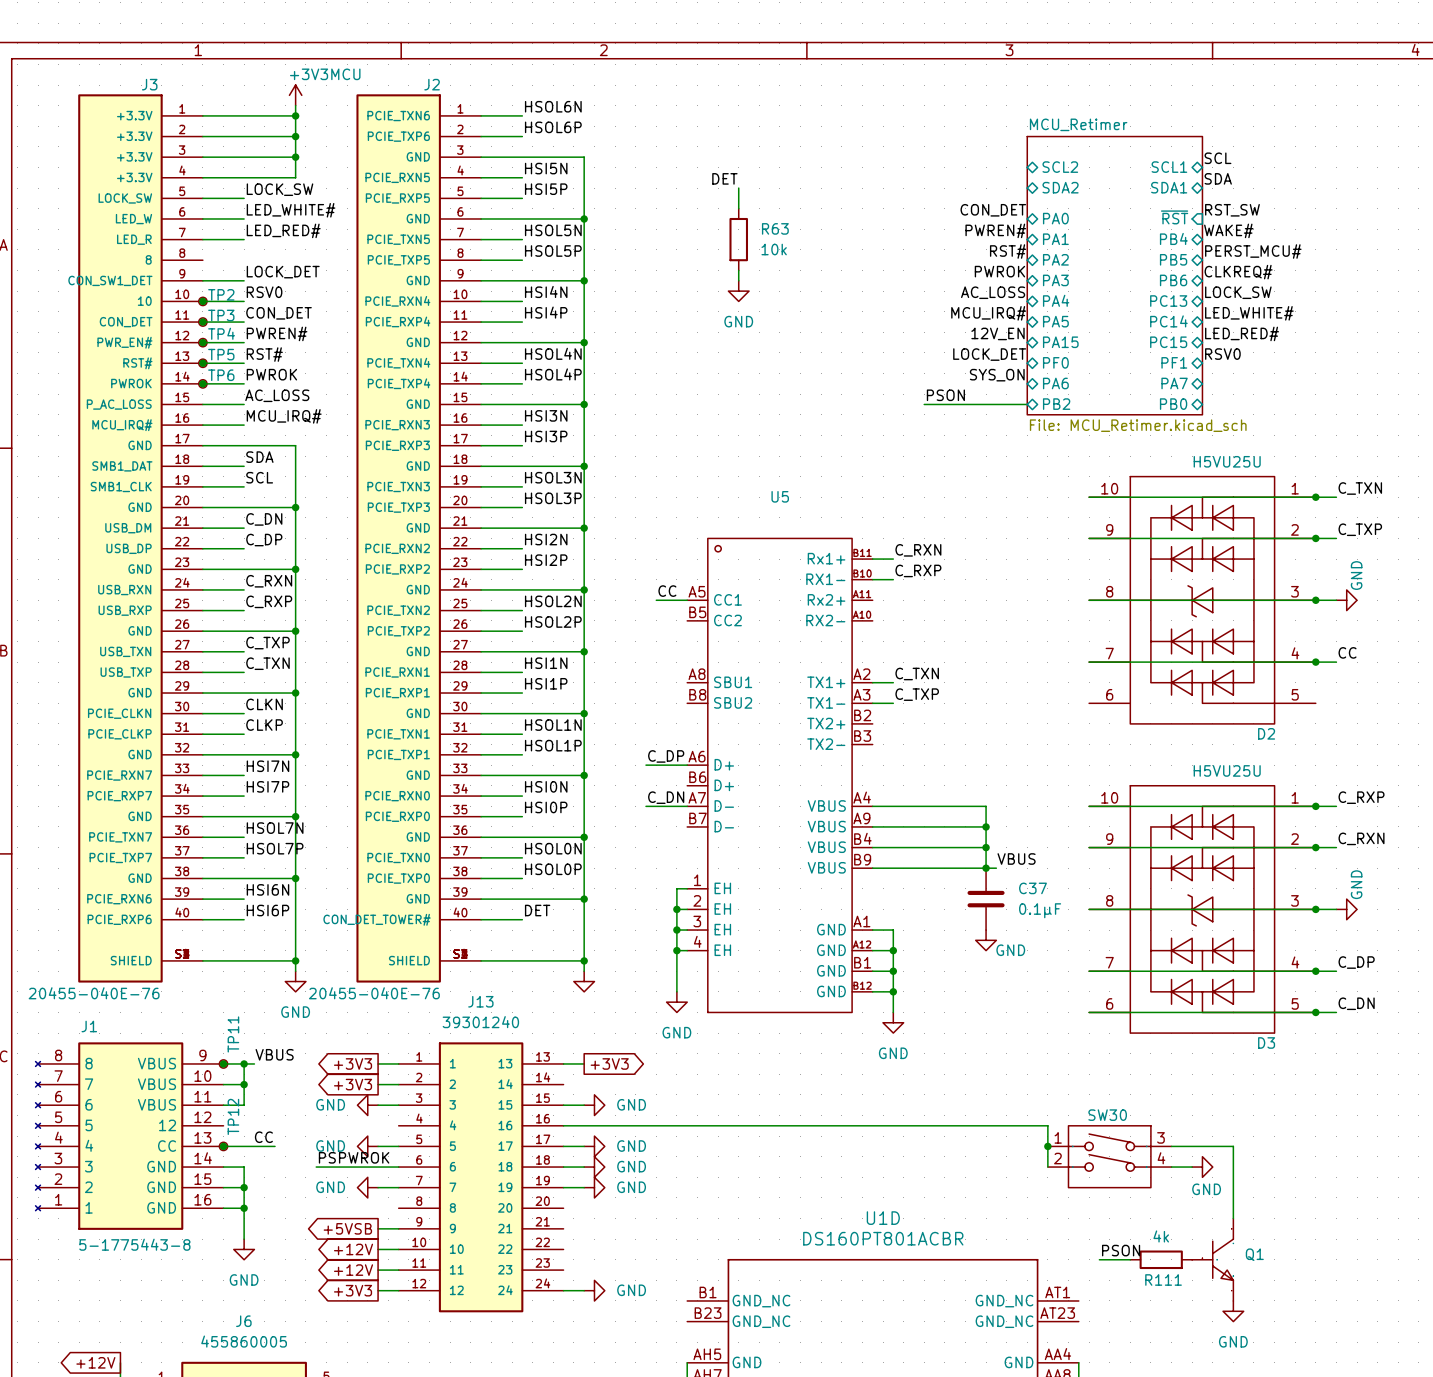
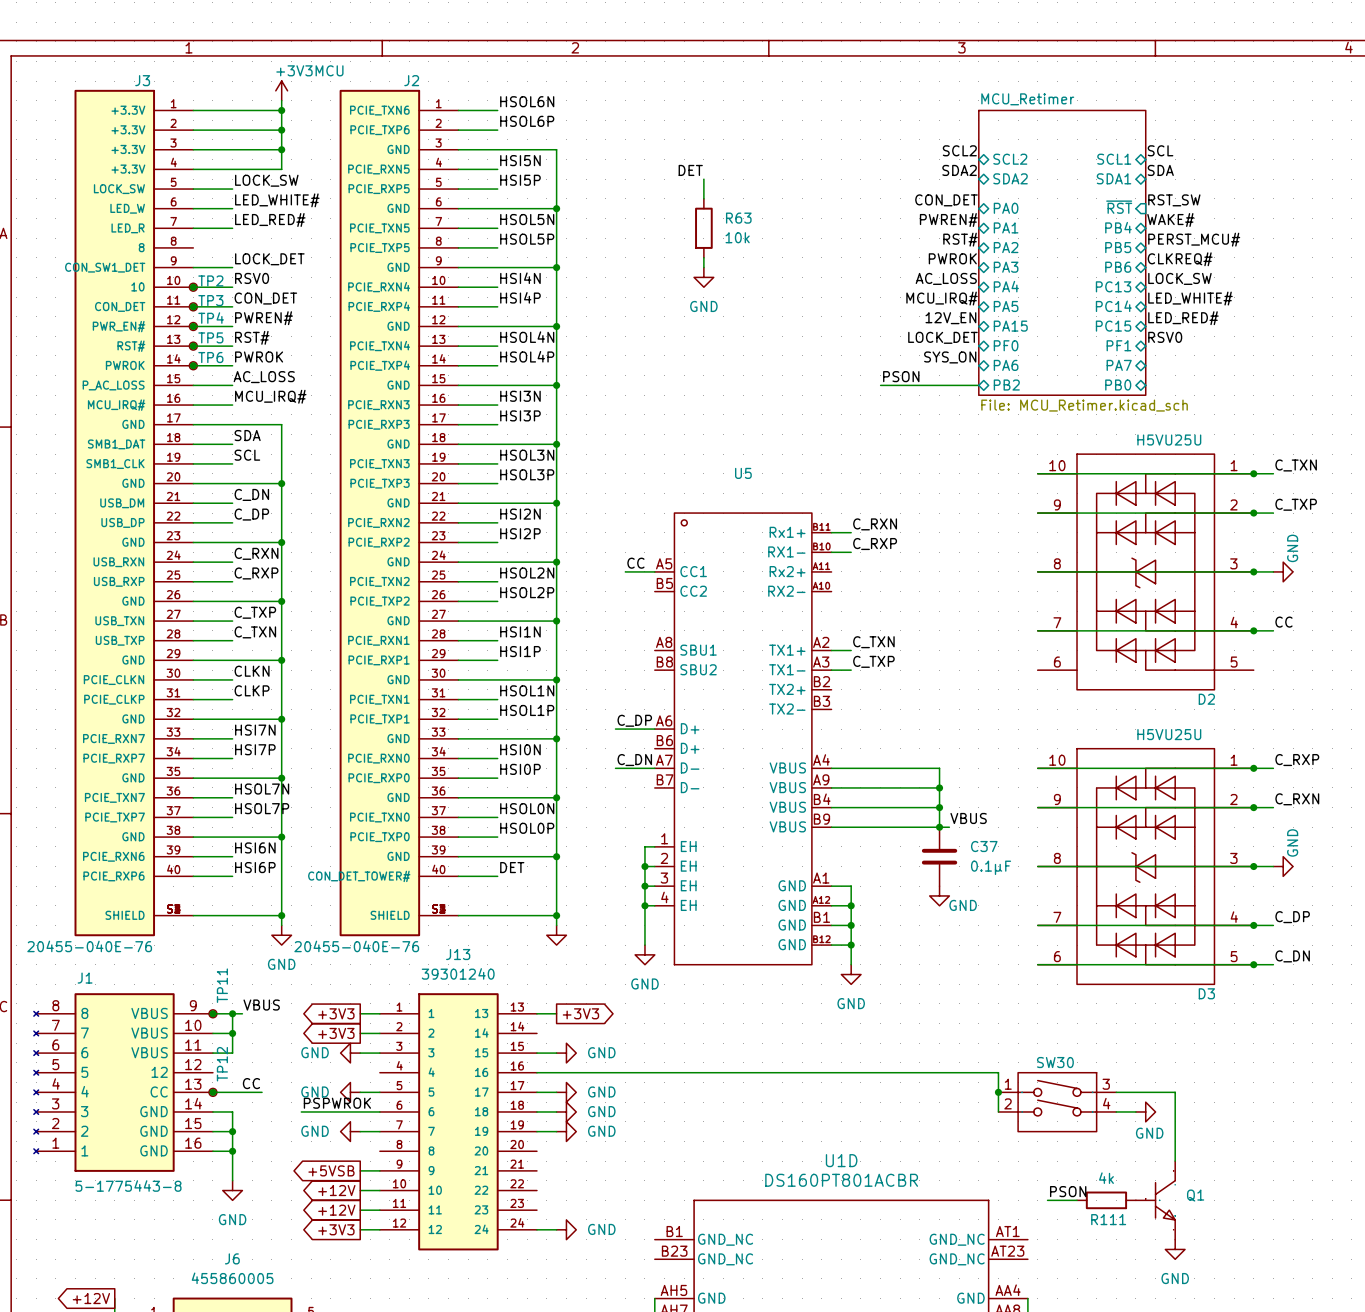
label: none -> SCL2 (959, 150)
label: none -> SDA2 (959, 170)
sheet MCU_Retimer: none -> File: MCU_Retimer.kicad_sch (1062, 252)
sheet MCU_Retimer: File: MCU_Retimer.kicad_sch (1114, 275) -> none

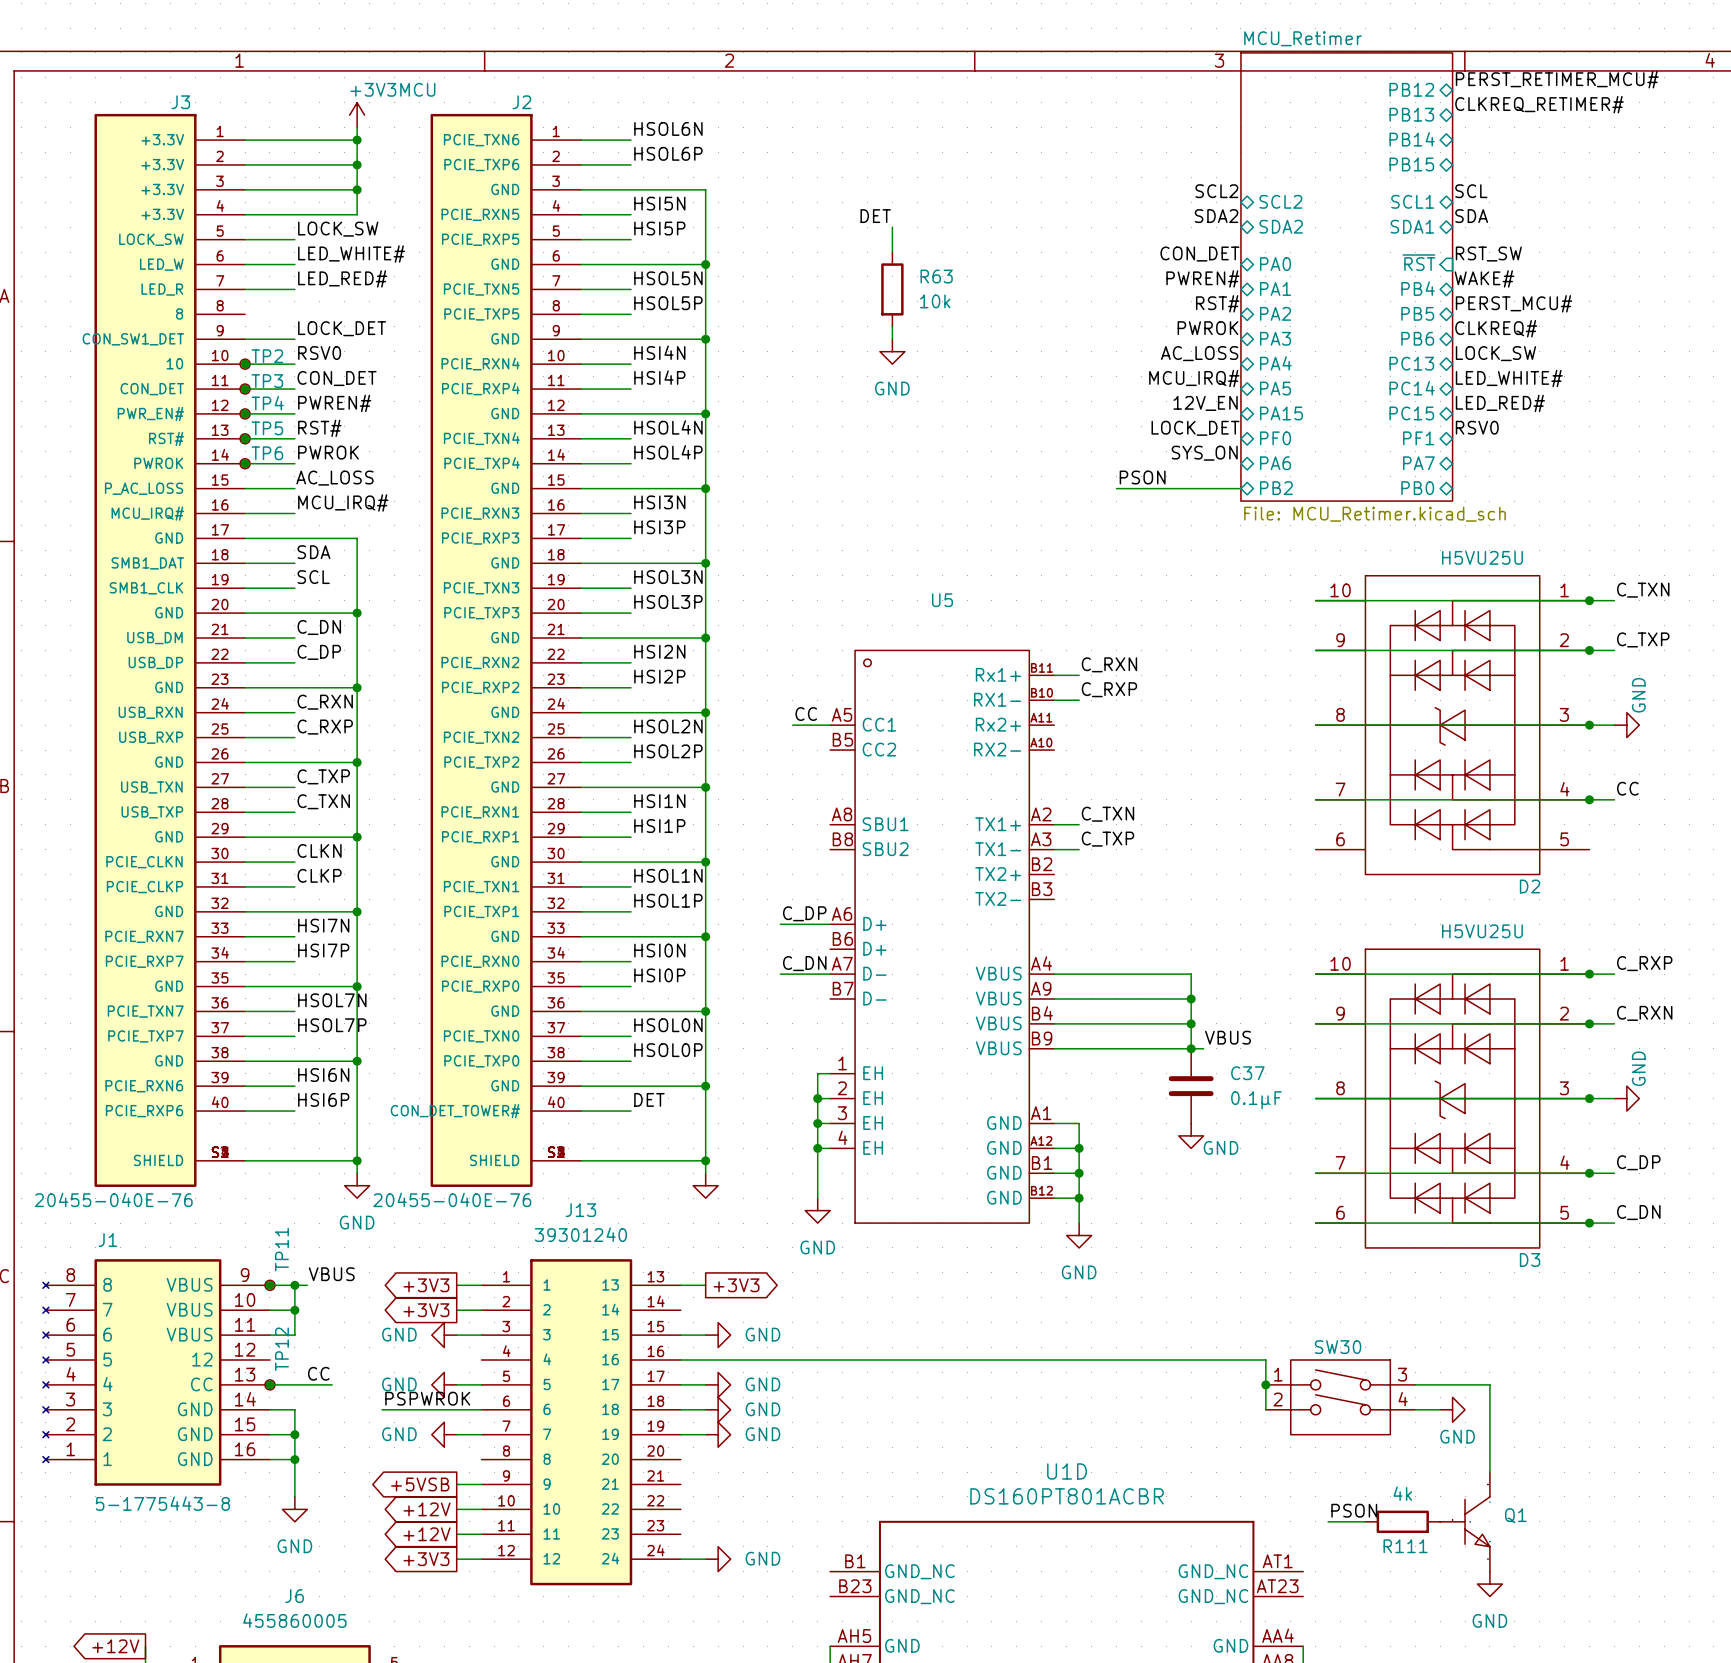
label: none -> PERST_RETIMER_MCU# (1557, 79)
sheet pin: none -> PB12 (1411, 89)
label: none -> CLKREQ_RETIMER# (1539, 104)
sheet pin: none -> PB13 (1411, 114)
sheet pin: none -> PB14 (1412, 139)
sheet pin: none -> PB15 (1411, 164)
sheet MCU_Retimer: none -> File: MCU_Retimer.kicad_sch (1346, 276)
sheet MCU_Retimer: File: MCU_Retimer.kicad_sch (1062, 252) -> none

